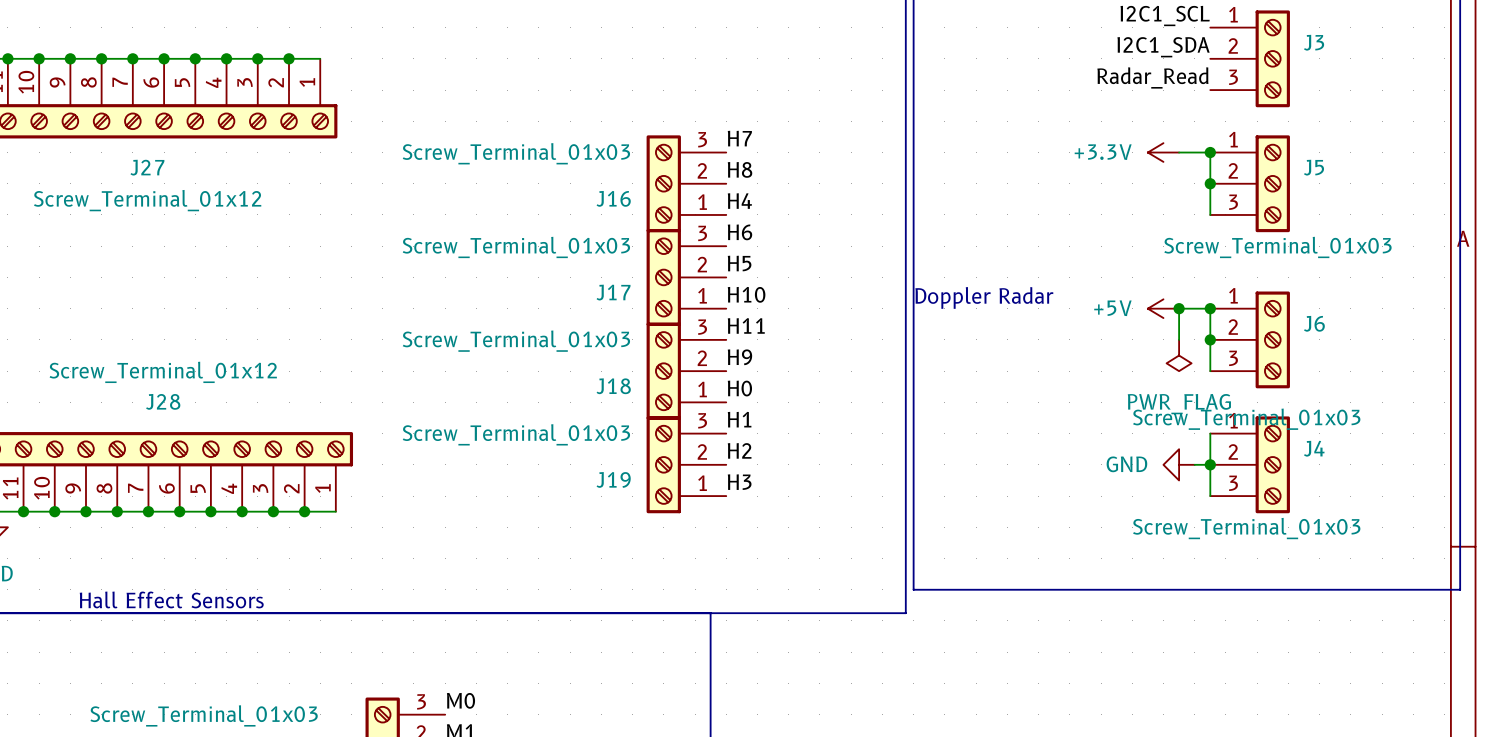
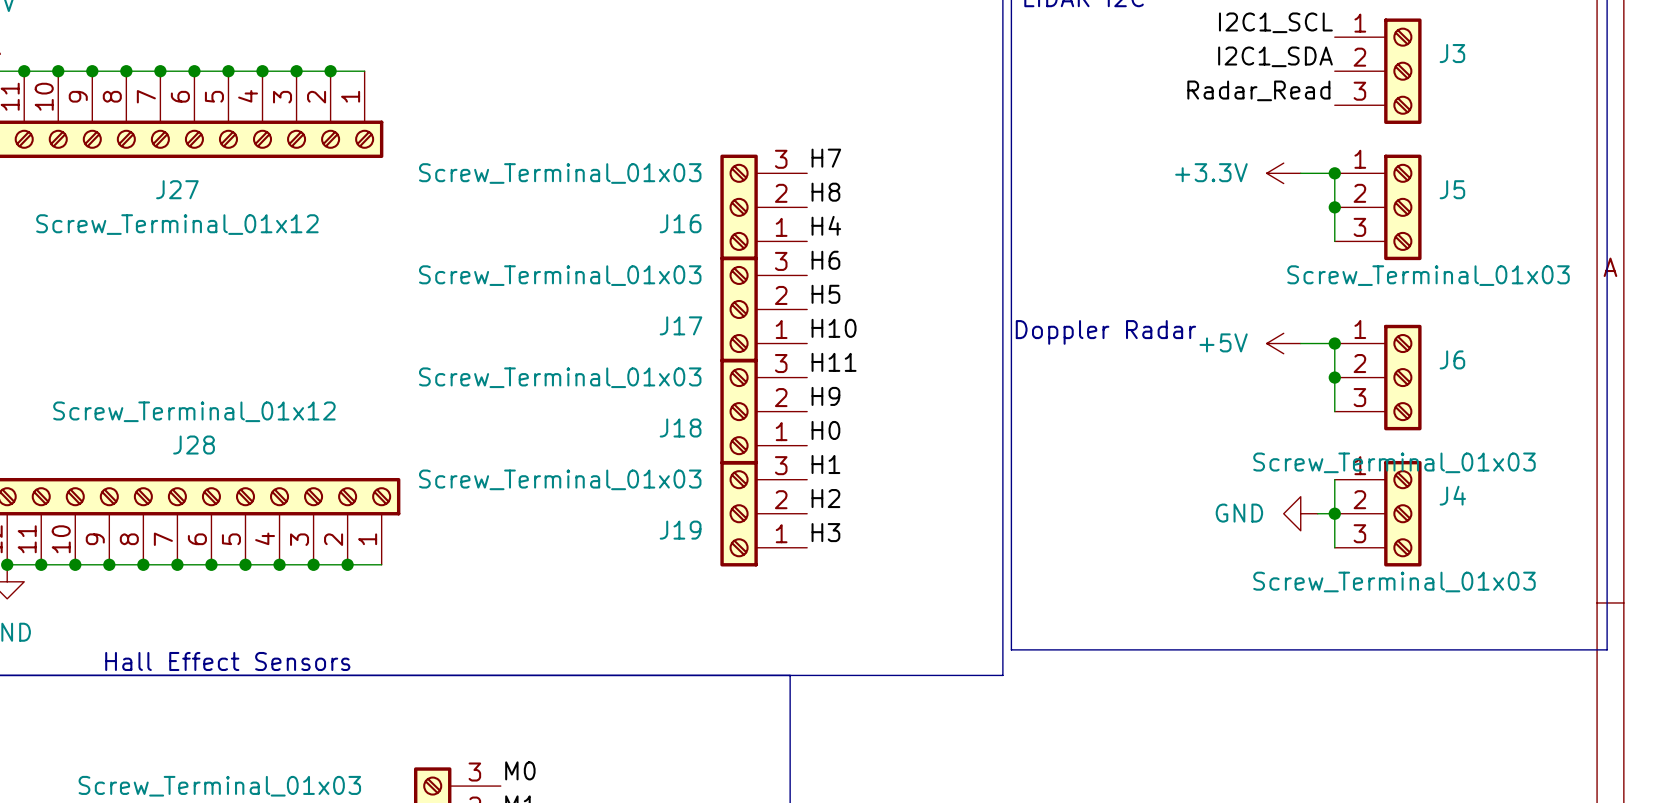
wire: (1179, 308) (1179, 339) -> none
junction: (1179, 308) -> none
power symbol: PWR_FLAG (1179, 355) -> none

